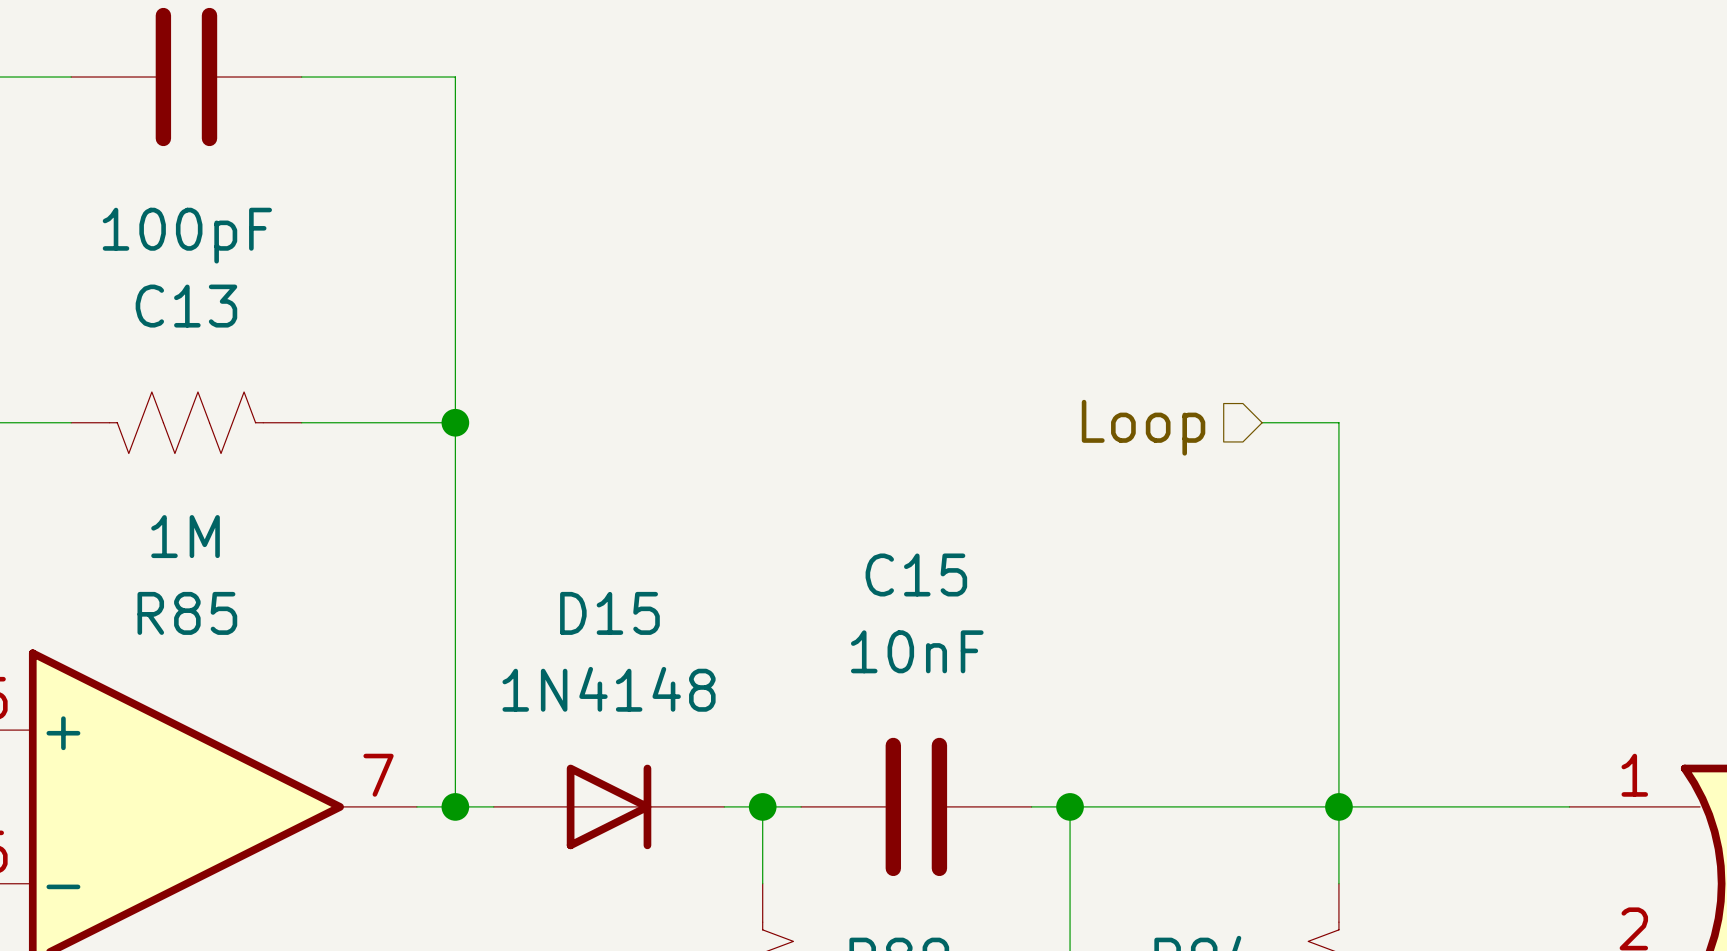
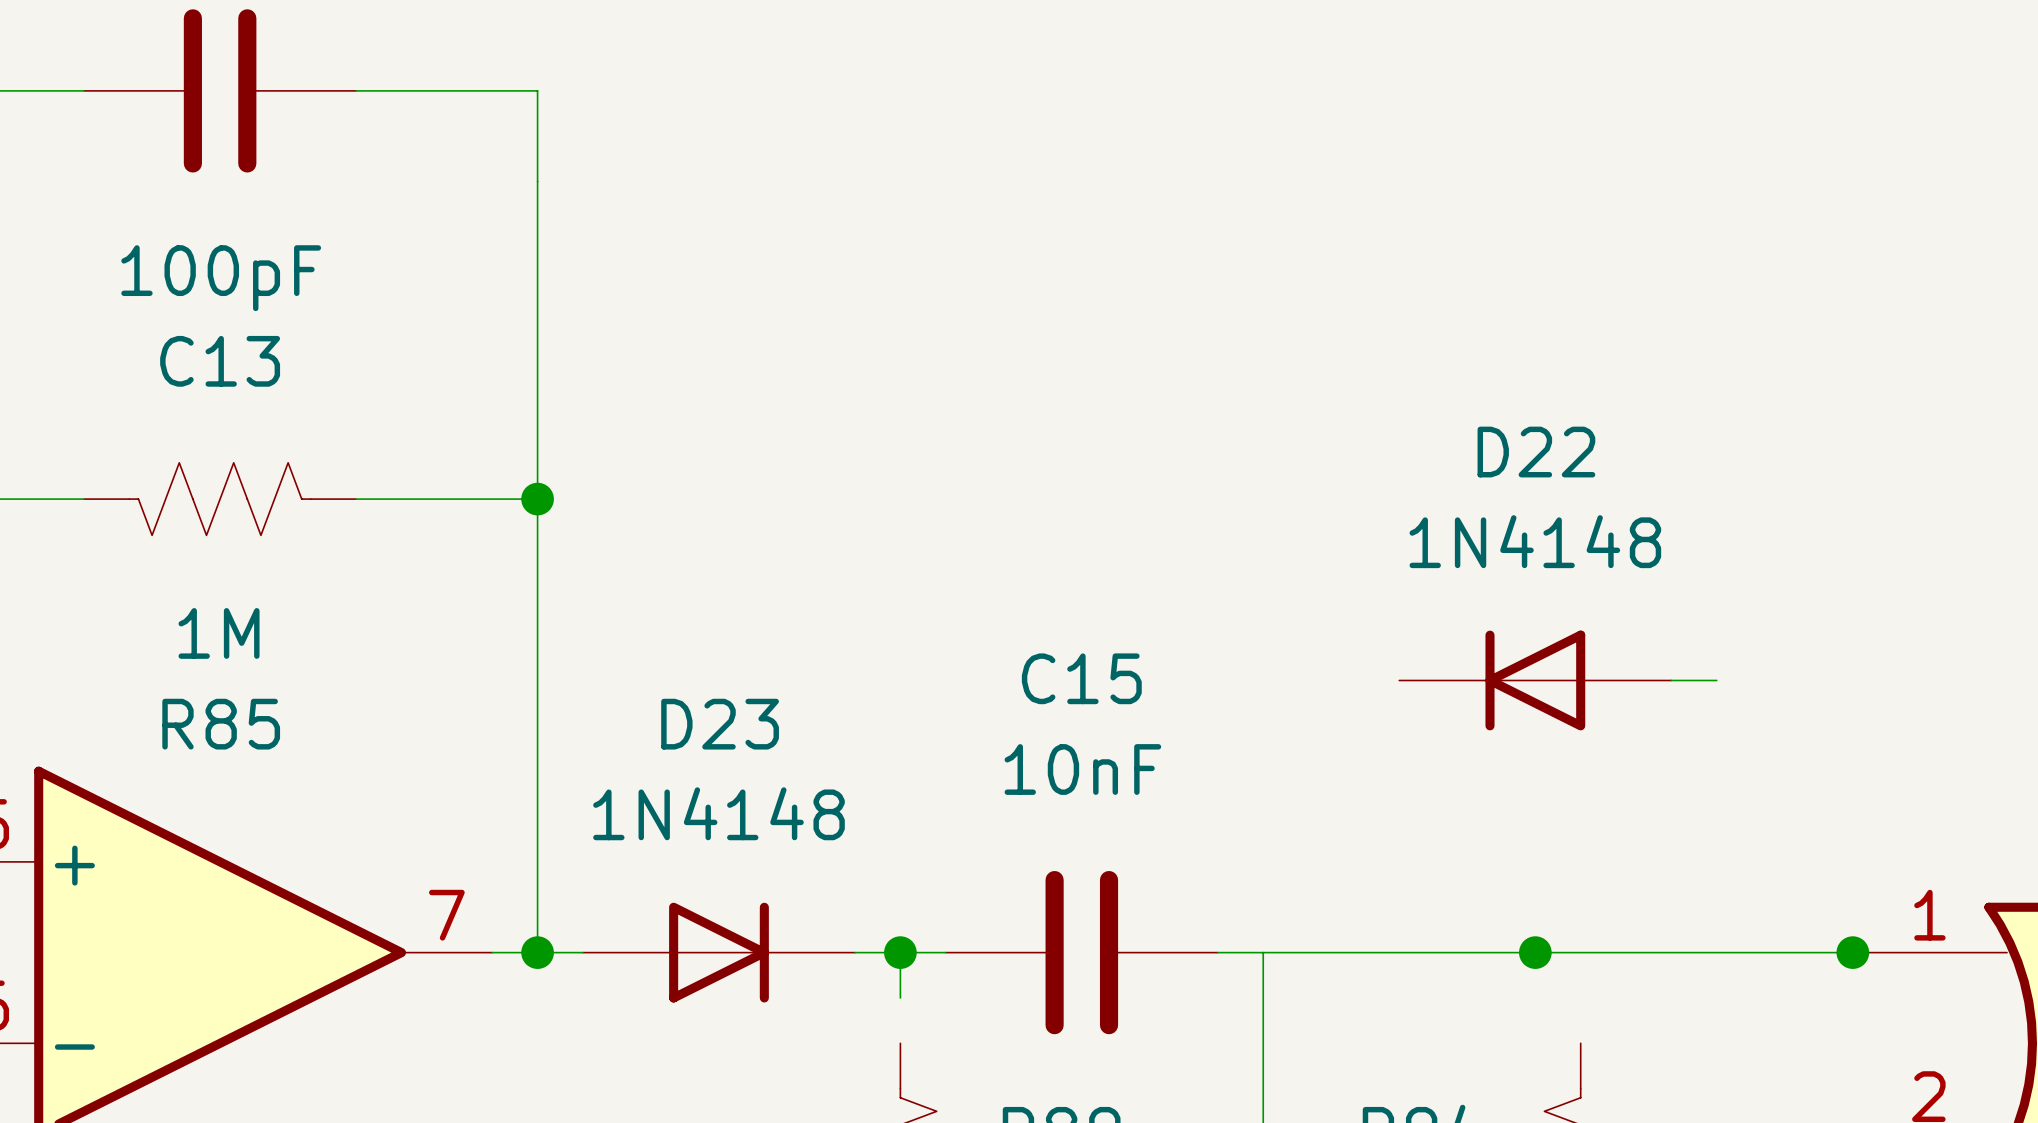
wire: (1262, 422) (1338, 422) (1338, 883) -> none
hierarchical label: Loop (1143, 427) -> none
D22: none -> 1N4148 (1535, 680)
wire: none -> (1671, 680) (1716, 680)
D15 name: D15 (609, 613) -> D23 (720, 724)
junction: (1070, 806) -> none
junction position: (1338, 806) -> (1535, 952)
junction: none -> (1852, 952)
wire: (762, 845) (762, 883) -> none

